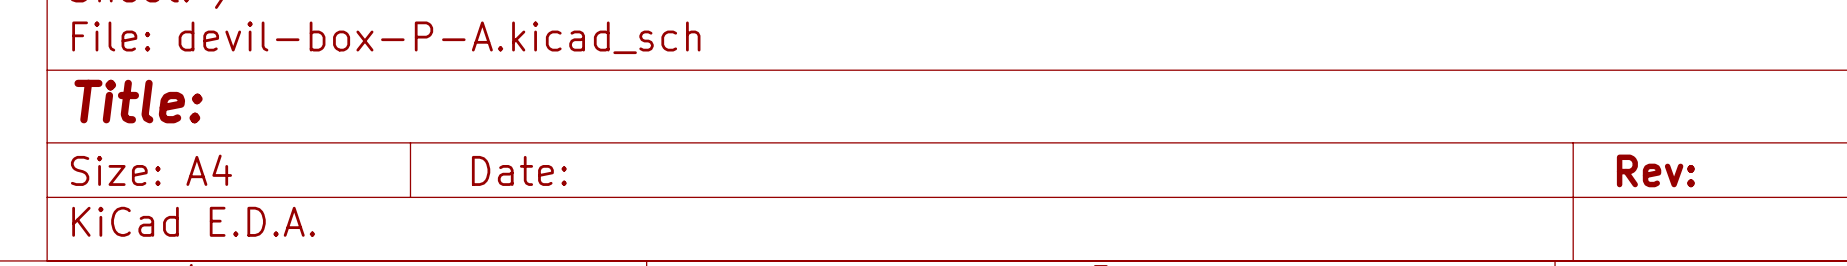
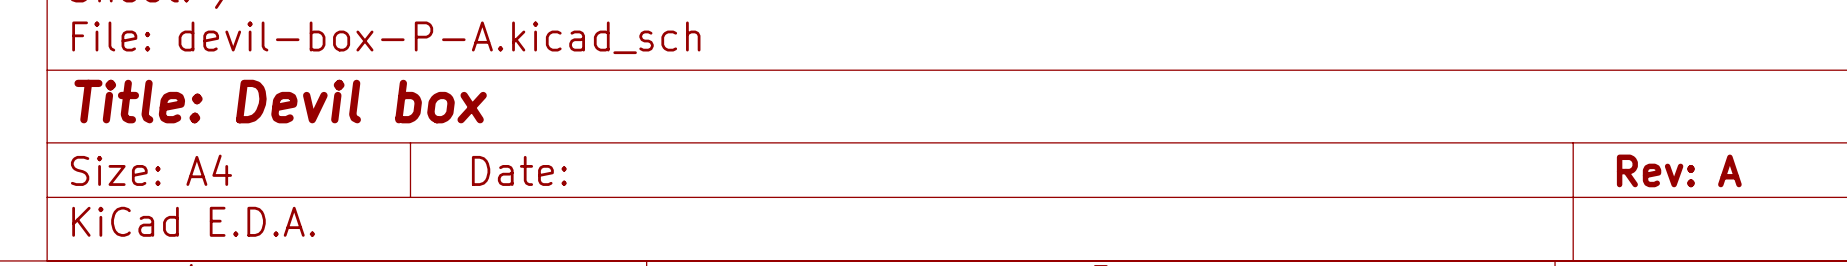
title block: Title: (138, 101) -> Title: Devil box (280, 101)
title block: Rev: (1655, 170) -> Rev: A (1679, 170)

